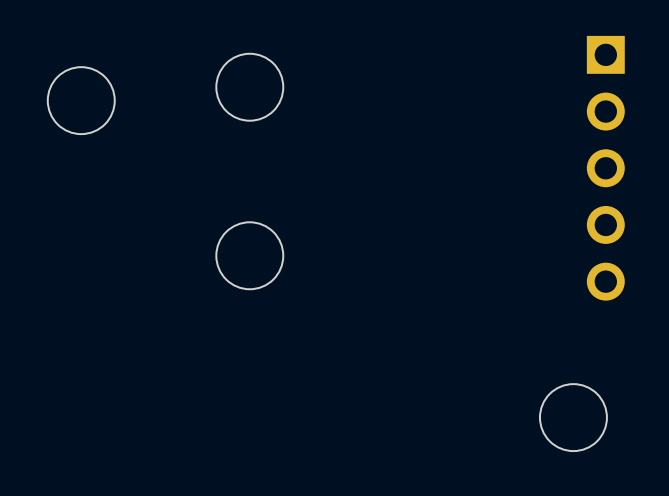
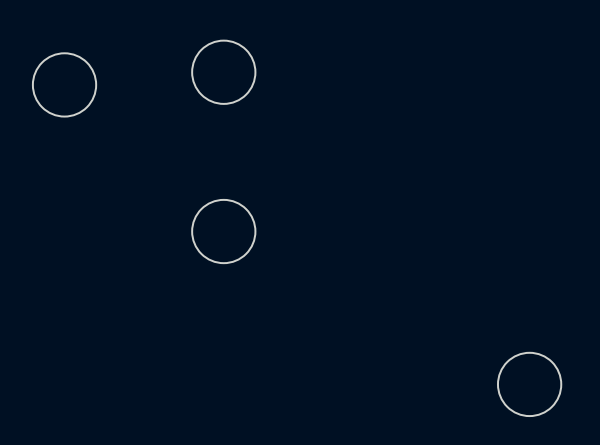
part: (605, 168) -> none

